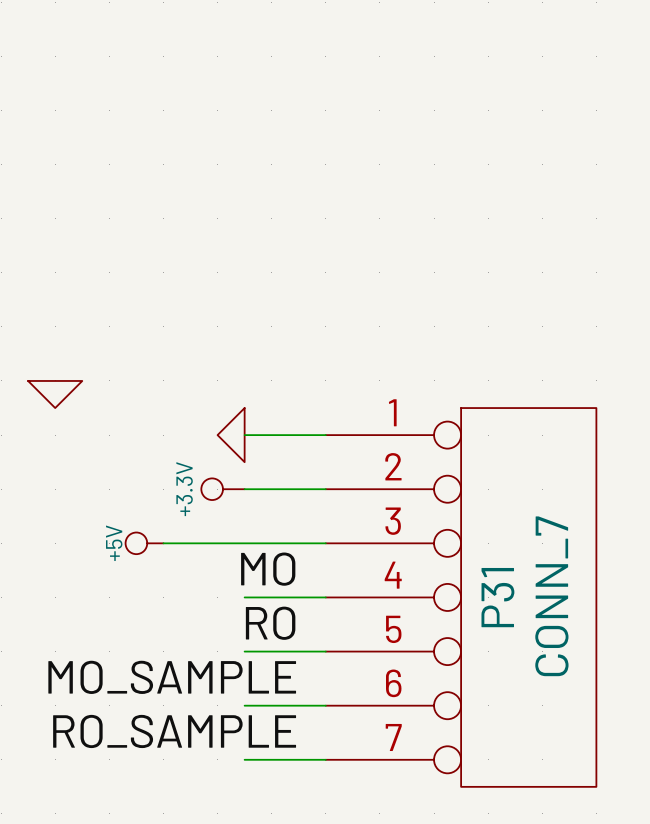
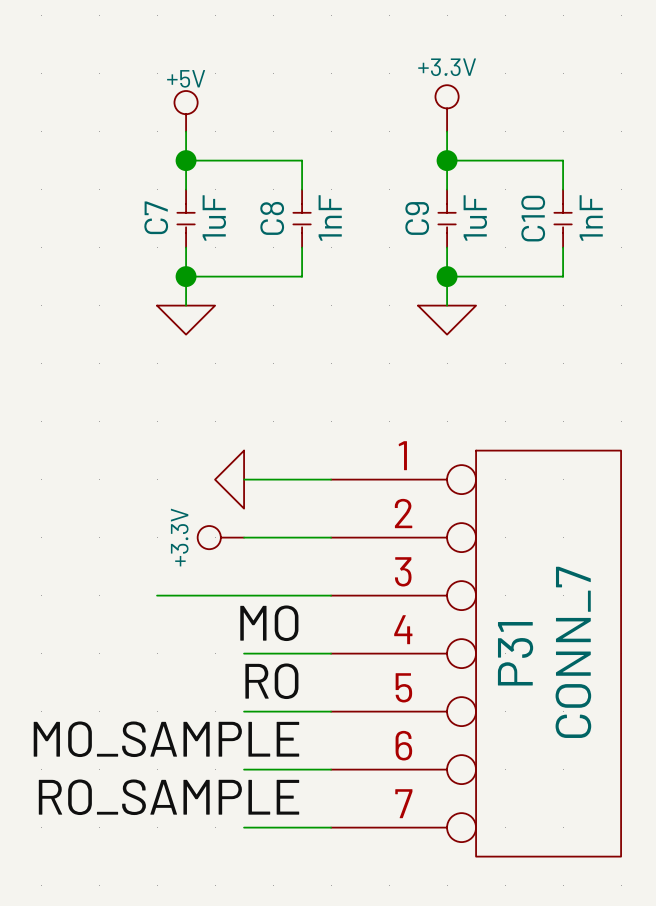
power symbol: none -> +3.3V (447, 108)
wire: none -> (186, 131) (186, 189)
wire: none -> (447, 131) (447, 189)
wire: none -> (186, 160) (302, 160) (302, 189)
junction: none -> (186, 160)
wire: none -> (447, 160) (563, 160) (563, 189)
junction: none -> (447, 160)
C7: none -> 1uF (186, 218)
C8: none -> 1nF (302, 218)
C9: none -> 1uF (447, 218)
C10: none -> 1nF (563, 218)
wire: none -> (186, 247) (186, 305)
wire: none -> (302, 247) (302, 276) (186, 276)
wire: none -> (447, 247) (447, 305)
wire: none -> (563, 247) (563, 276) (447, 276)
junction: none -> (186, 276)
junction: none -> (447, 276)
power symbol: none -> (447, 320)
power symbol position: (55, 394) -> (186, 320)
power symbol rotation: 0° (144, 543) -> 90° clockwise (186, 111)
power symbol position: +5V (144, 543) -> +5V (186, 111)

